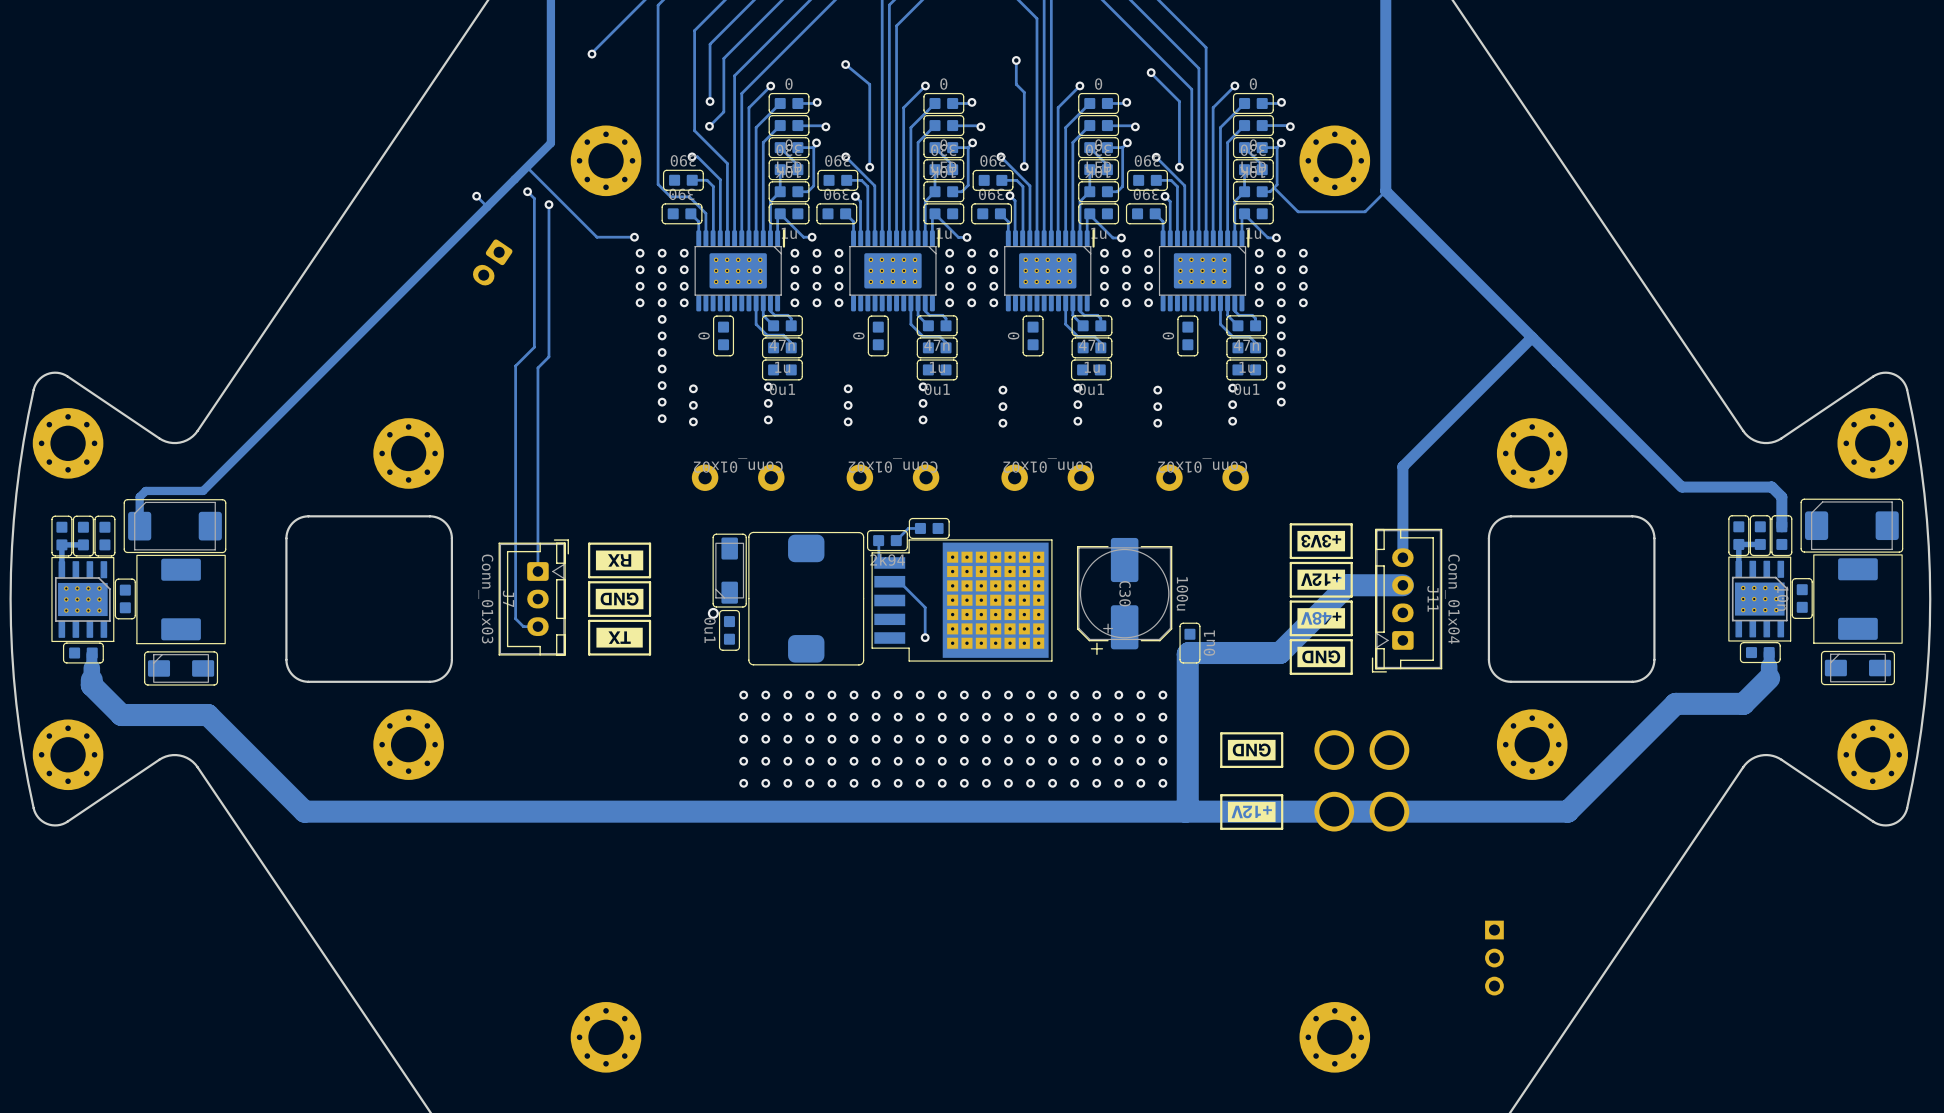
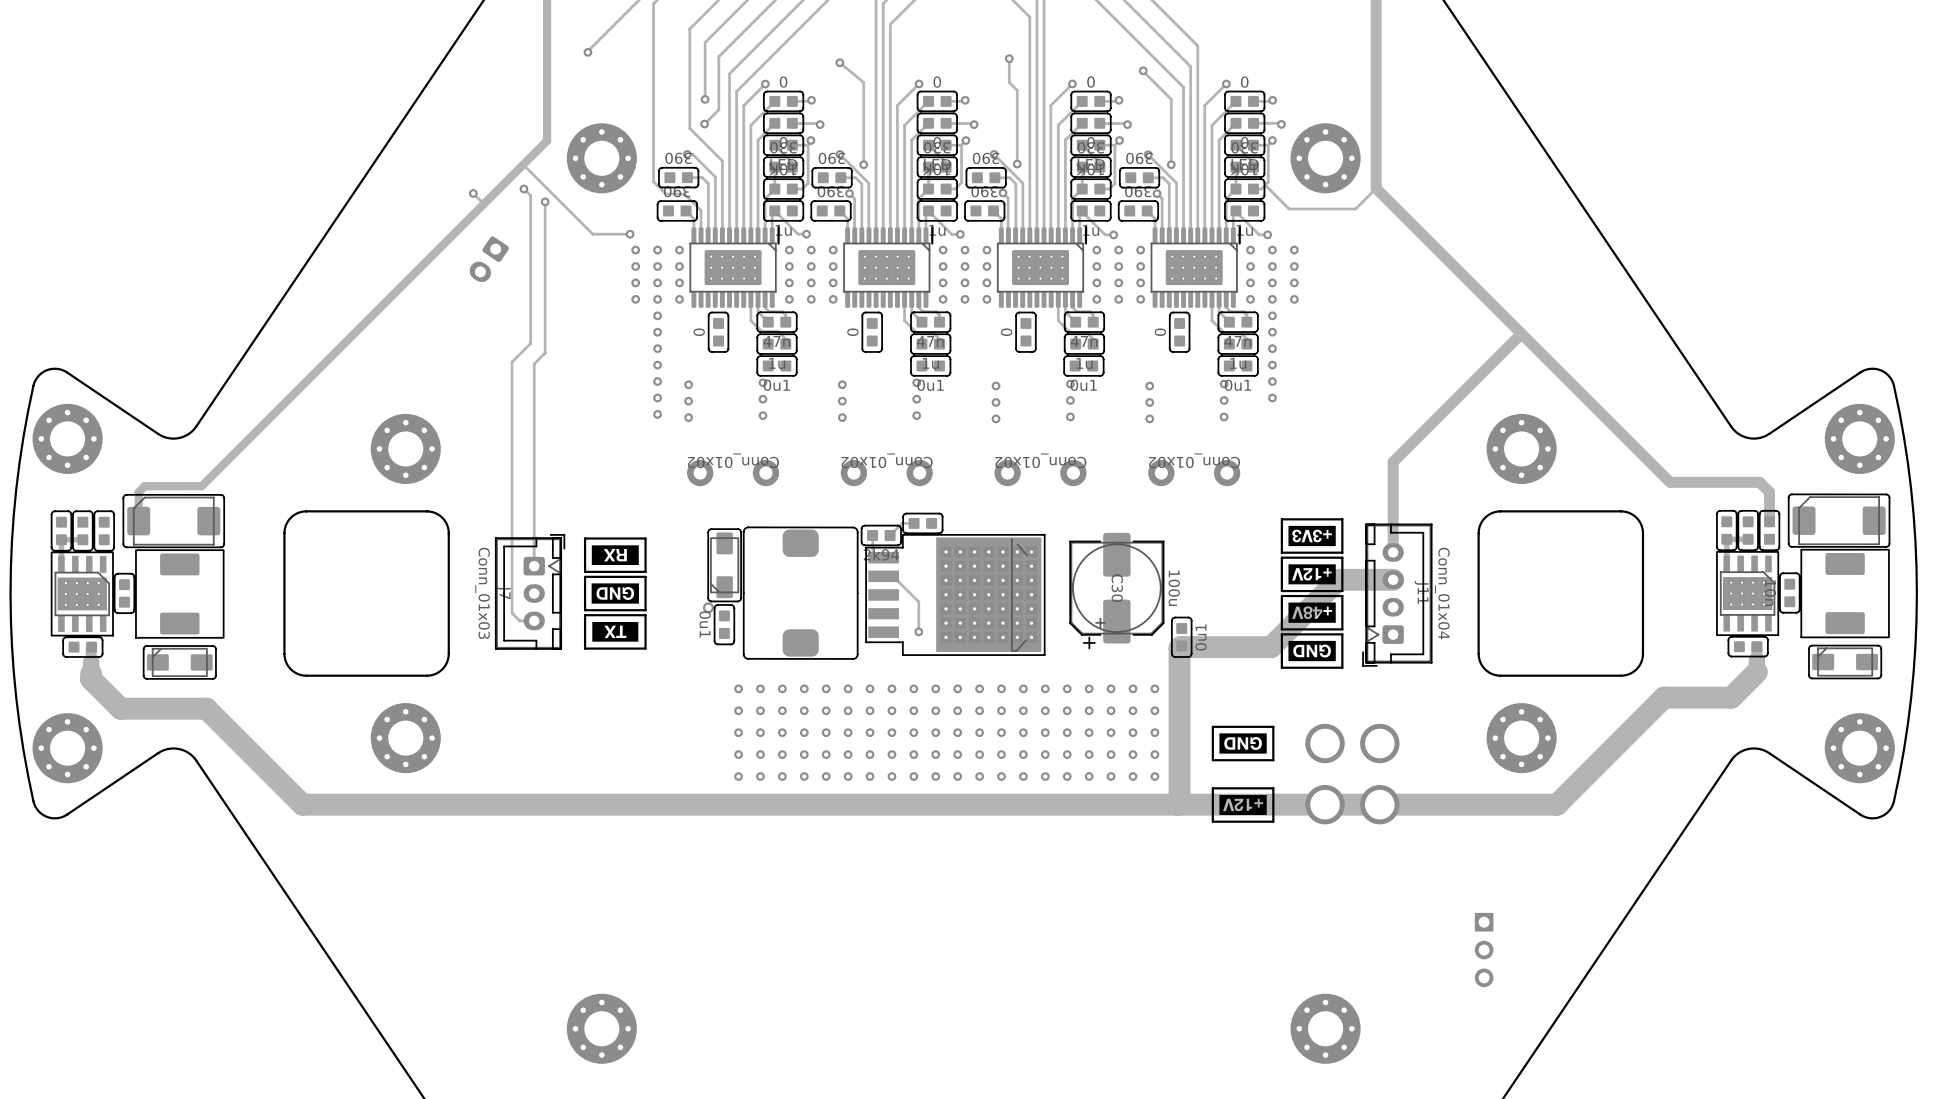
part footprint: [871, 539, 1053, 662] -> [865, 534, 1046, 656]

